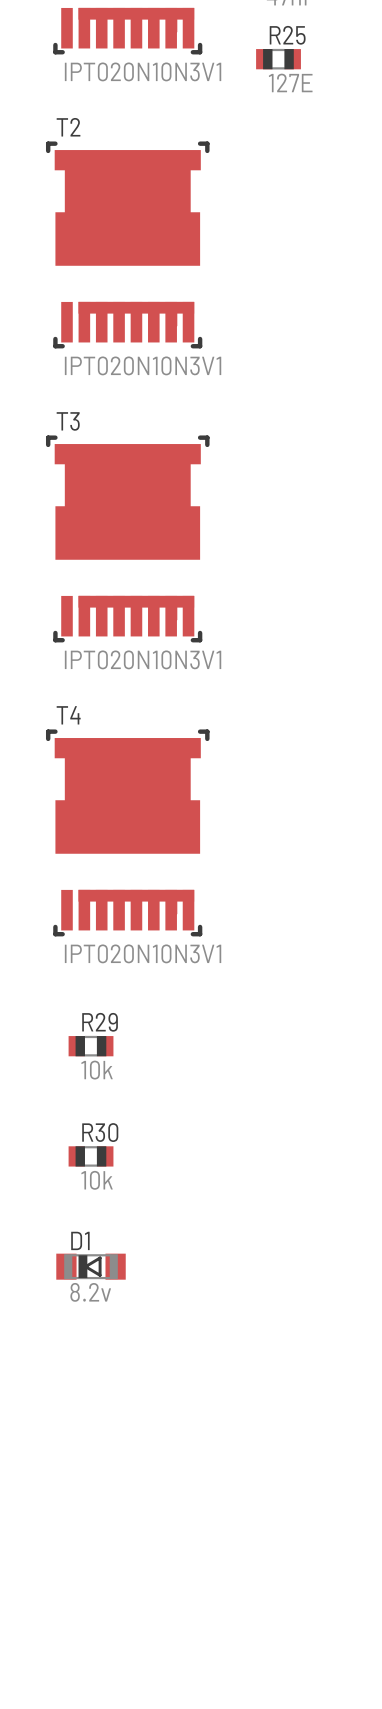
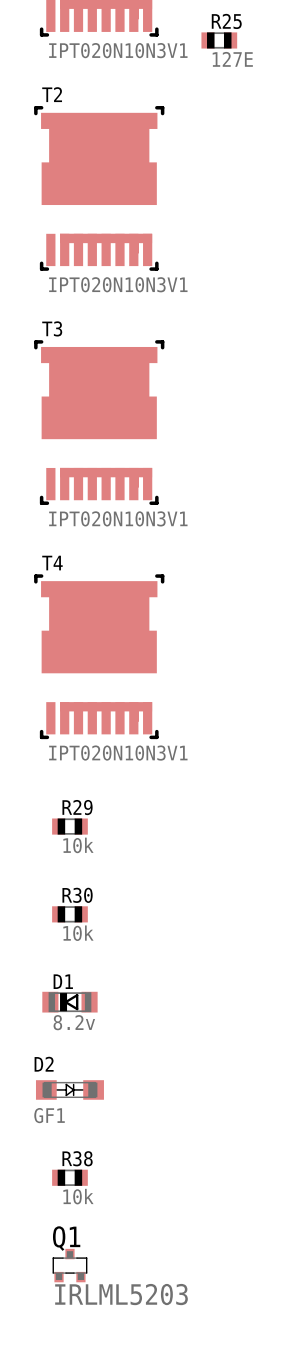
D2: none -> GF1 (69, 1089)
R38: none -> 10k (69, 1177)
Q1: none -> IRLML5203 (69, 1265)

